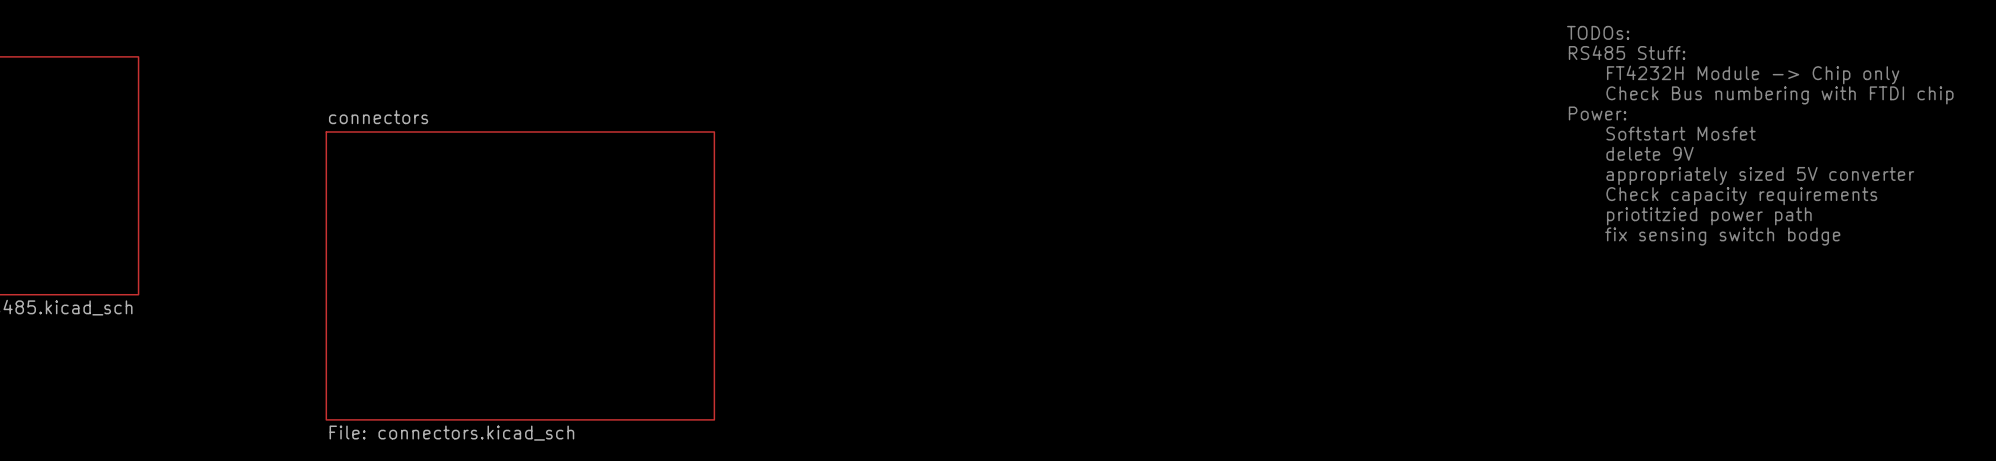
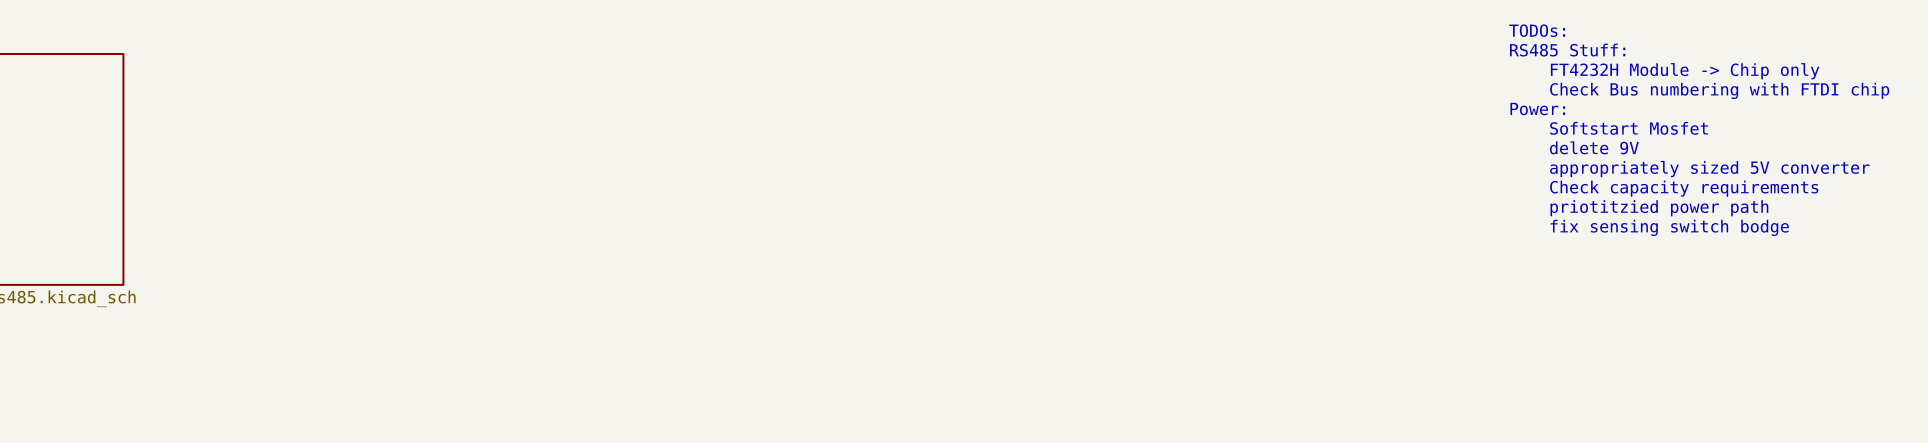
sheet connectors: File: connectors.kicad_sch (520, 275) -> none

